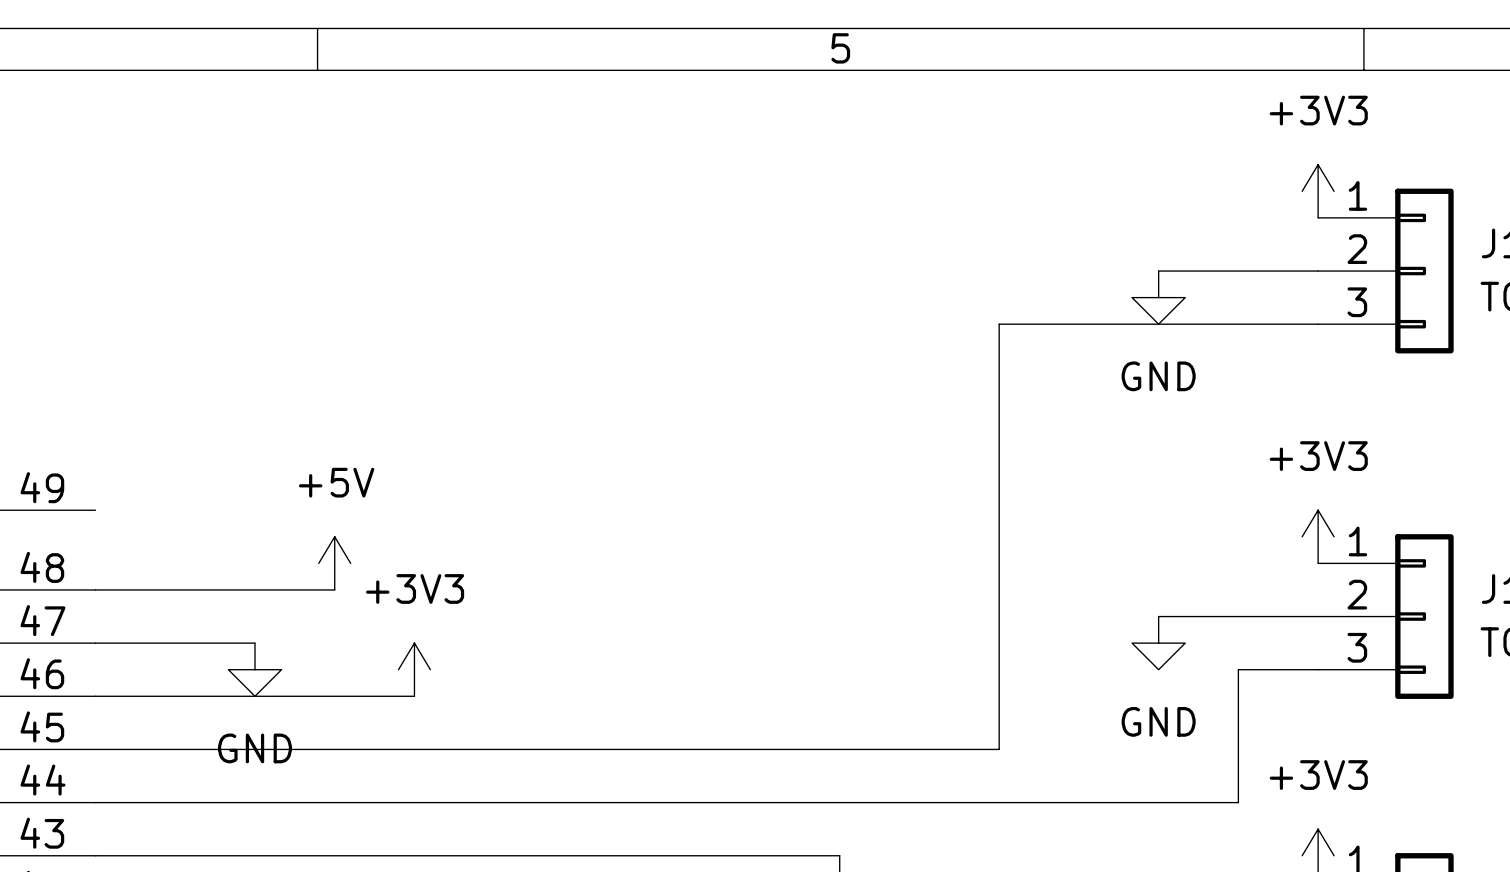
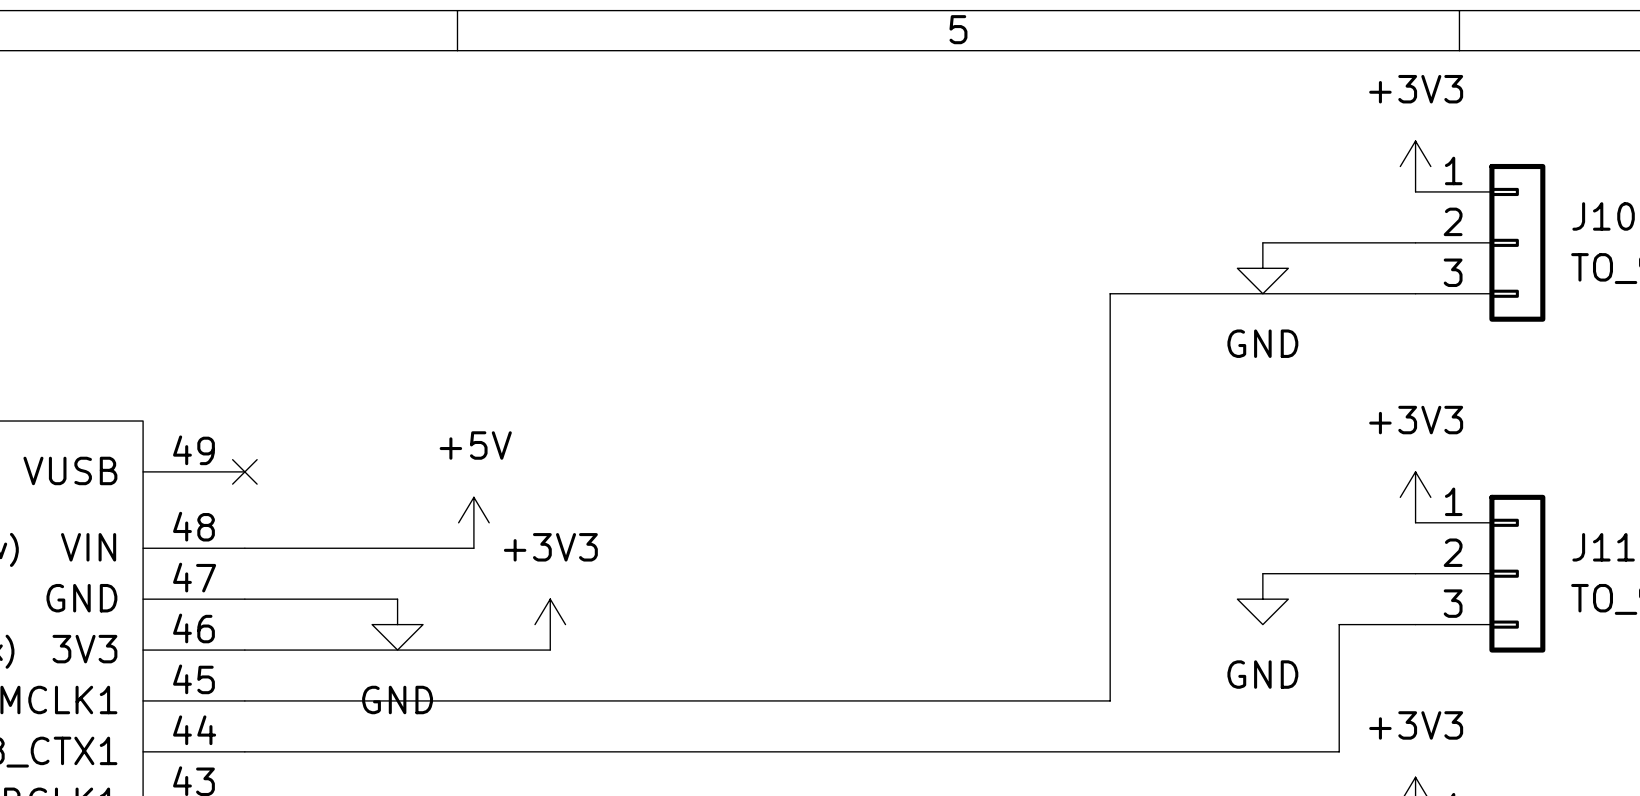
no-connect mark: none -> (244, 471)

